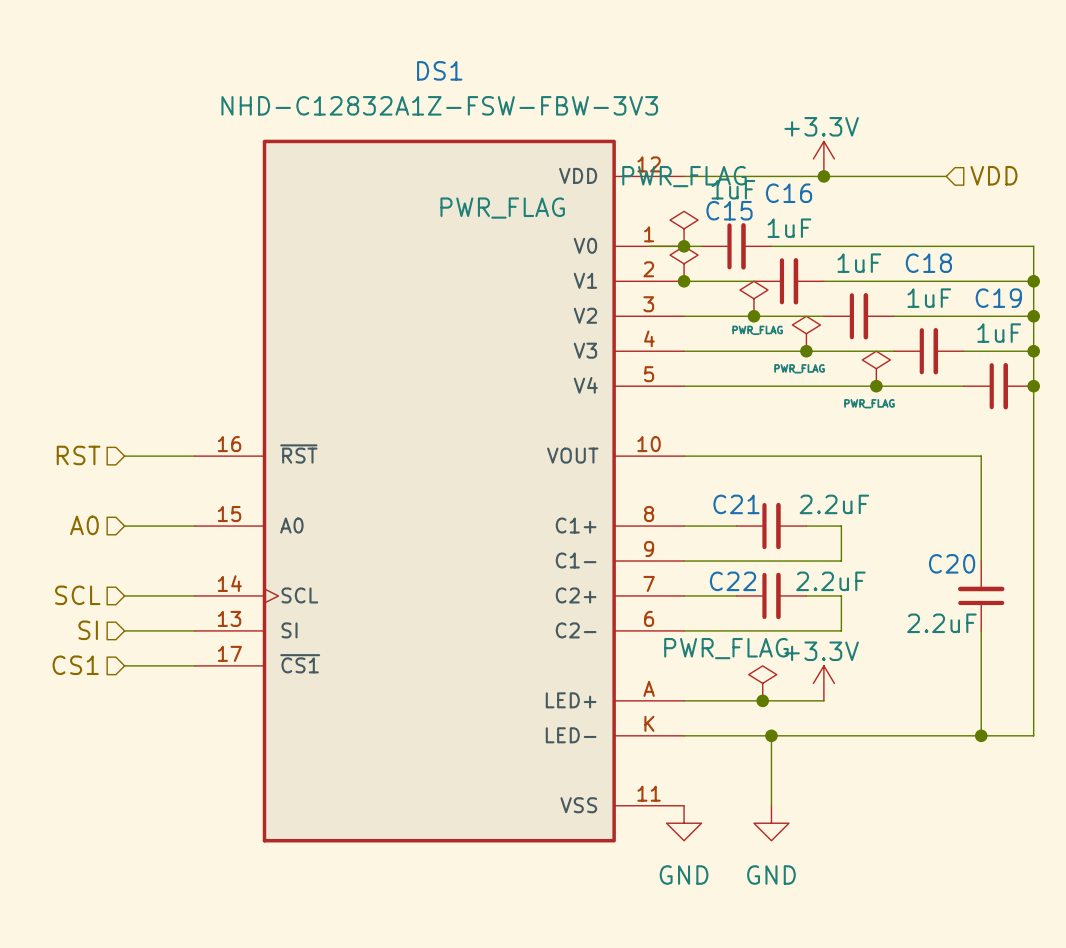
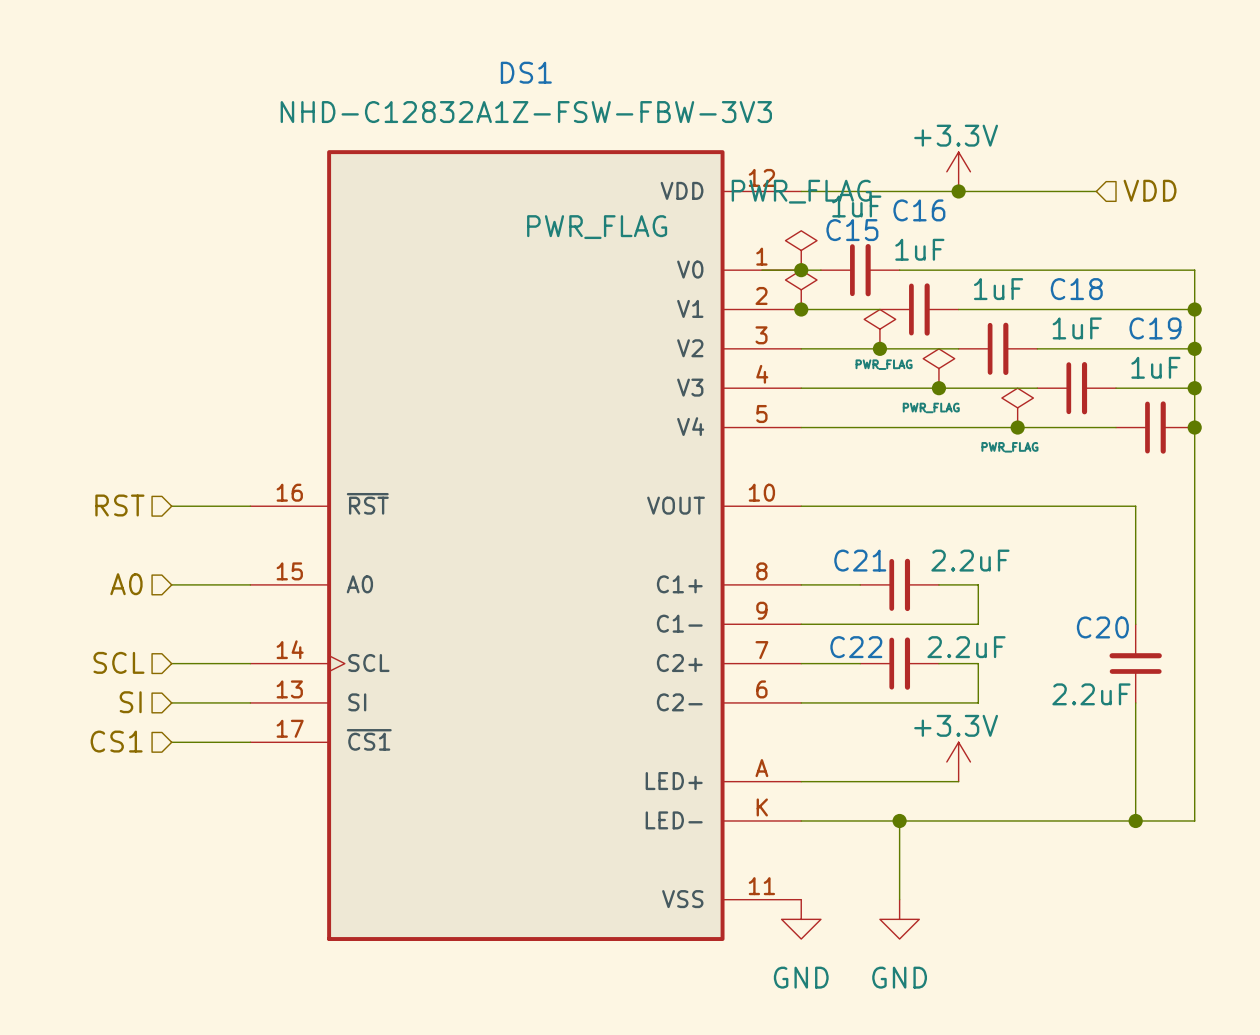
power symbol: PWR_FLAG (762, 683) -> none
junction: (762, 700) -> none

